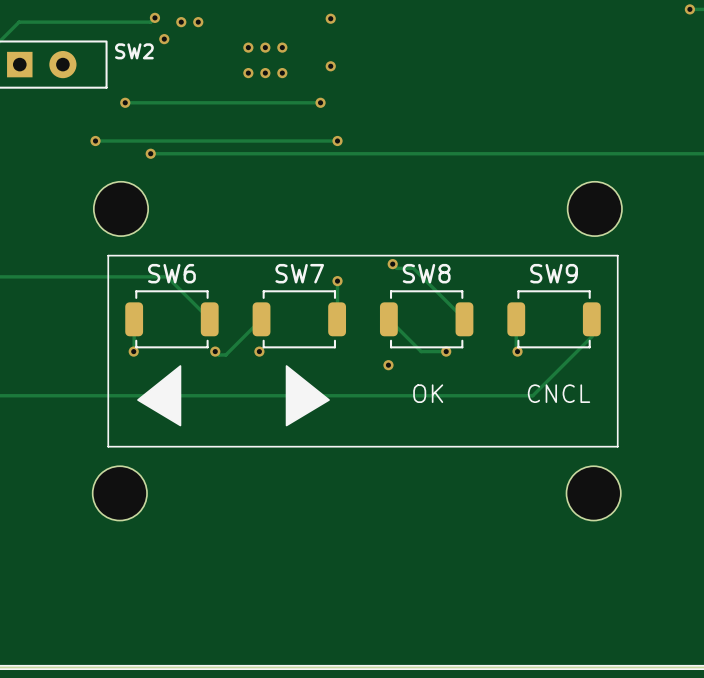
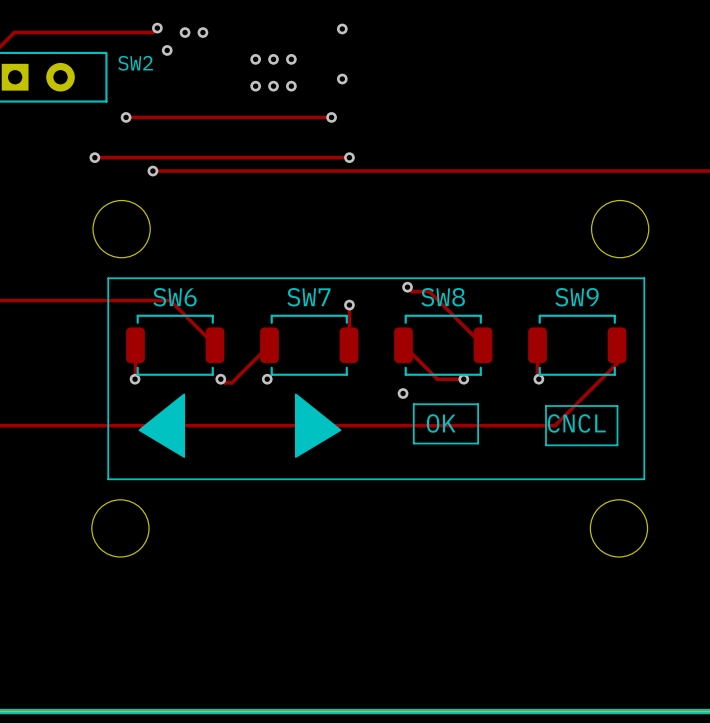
line: none -> (413, 404) (478, 404) (478, 443) (413, 443) (413, 404)
line: none -> (546, 406) (617, 406) (617, 445) (546, 445) (546, 406)

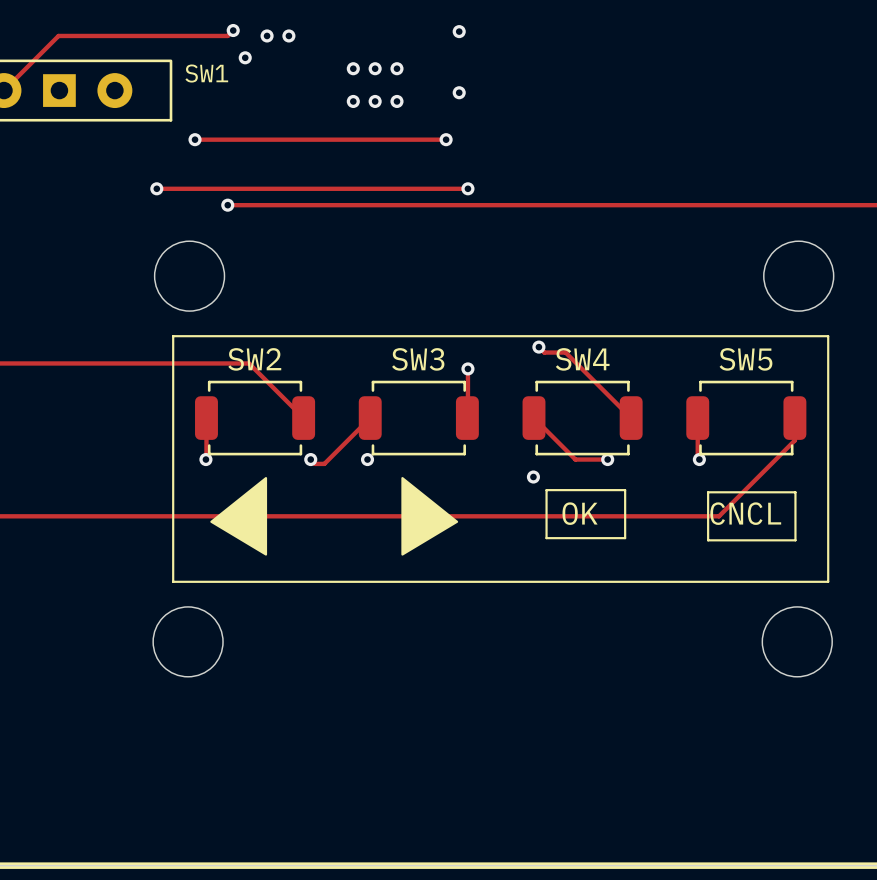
SW2 name: SW2 (135, 63) -> SW1 (206, 73)
SW6 name: SW6 (174, 297) -> SW2 (254, 359)
SW7 name: SW7 (308, 297) -> SW3 (418, 359)
SW8 name: SW8 (443, 297) -> SW4 (582, 359)
SW9 name: SW9 (577, 297) -> SW5 (745, 359)

